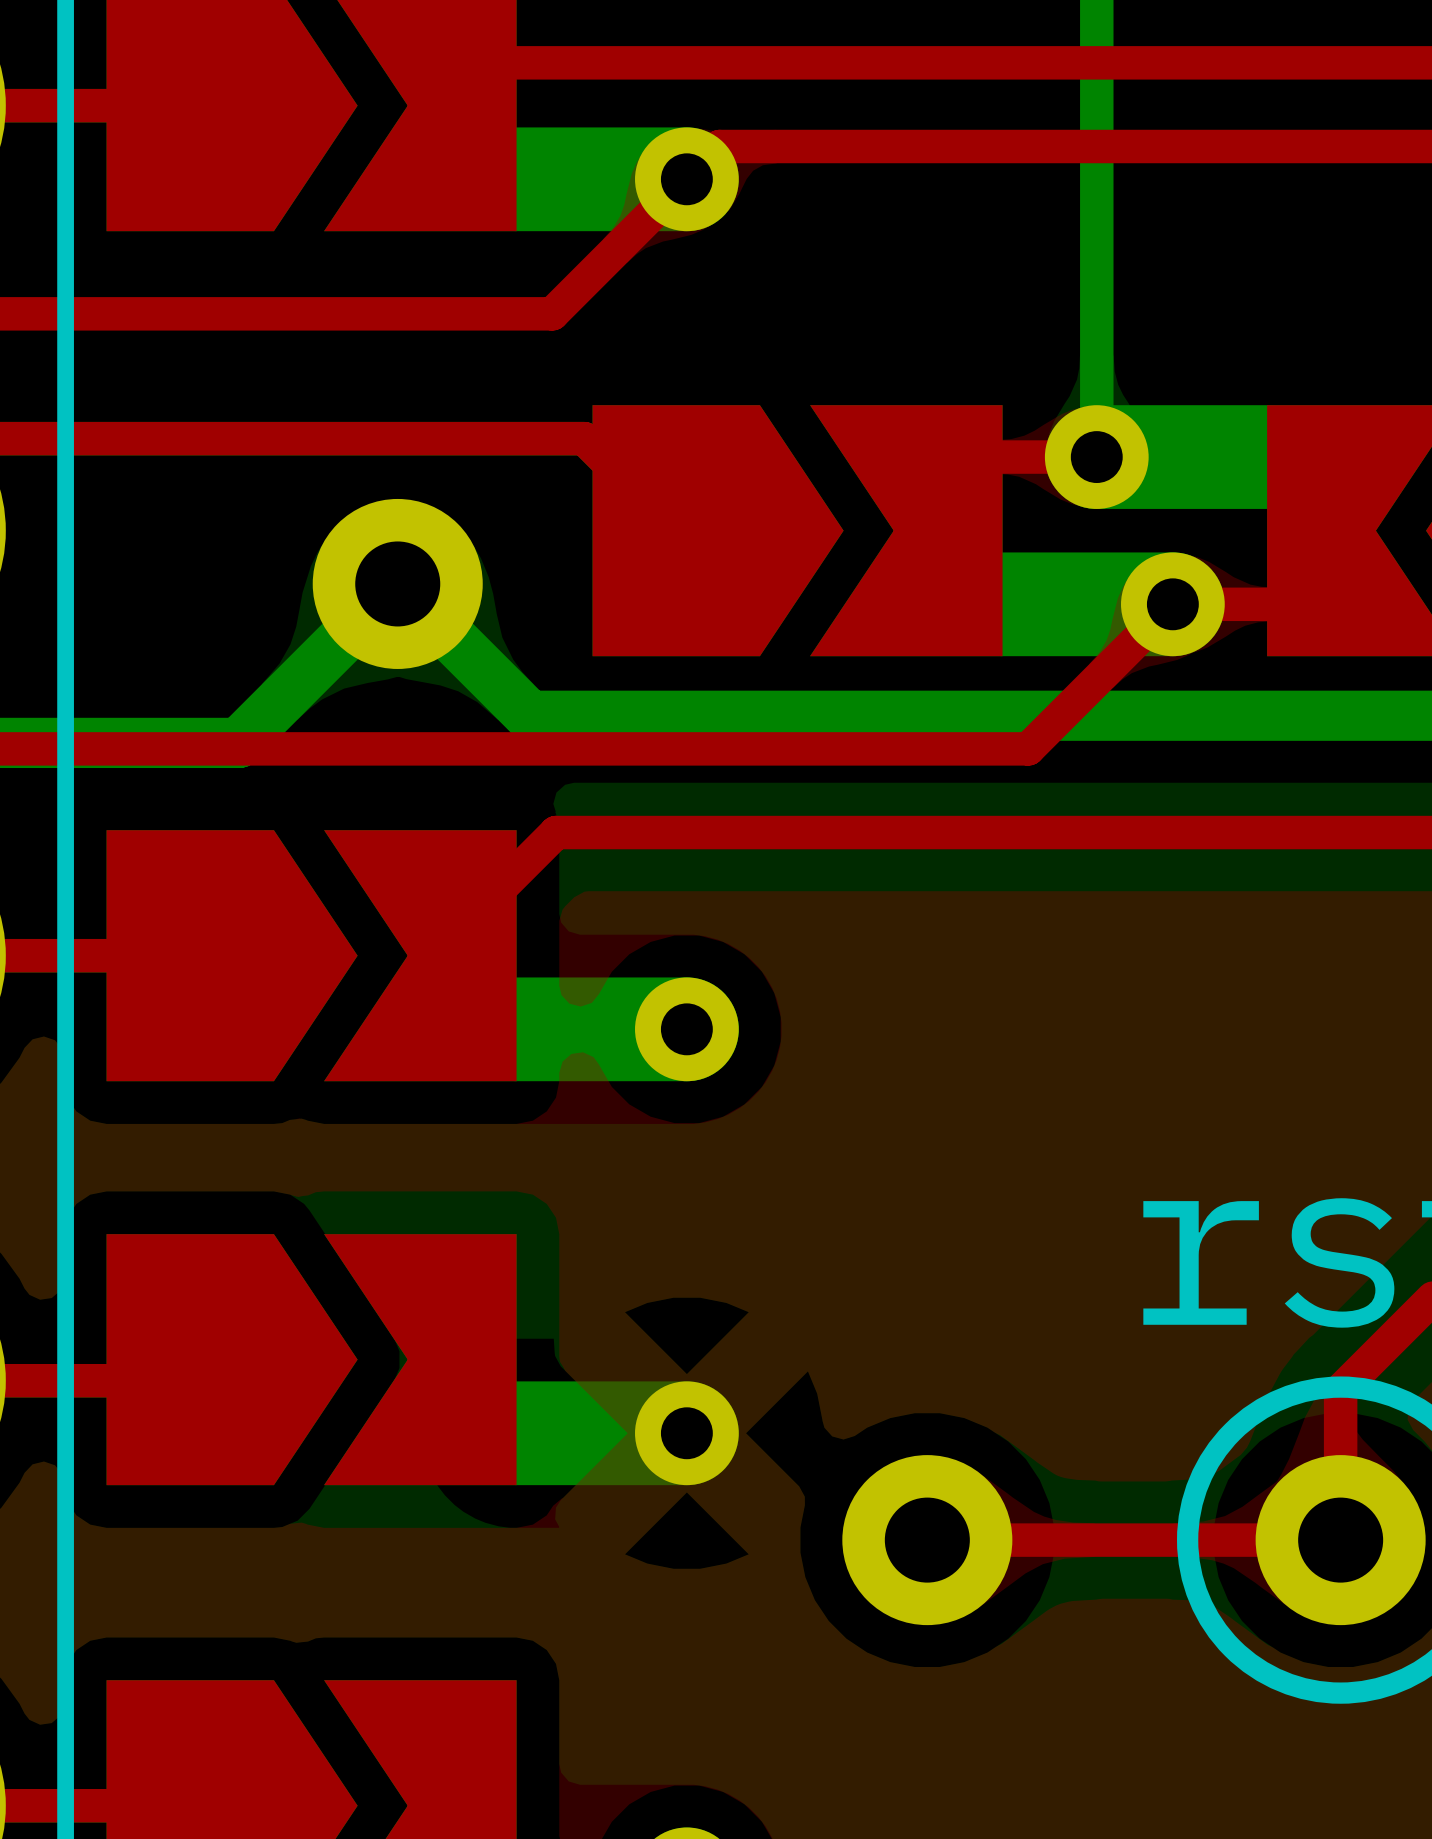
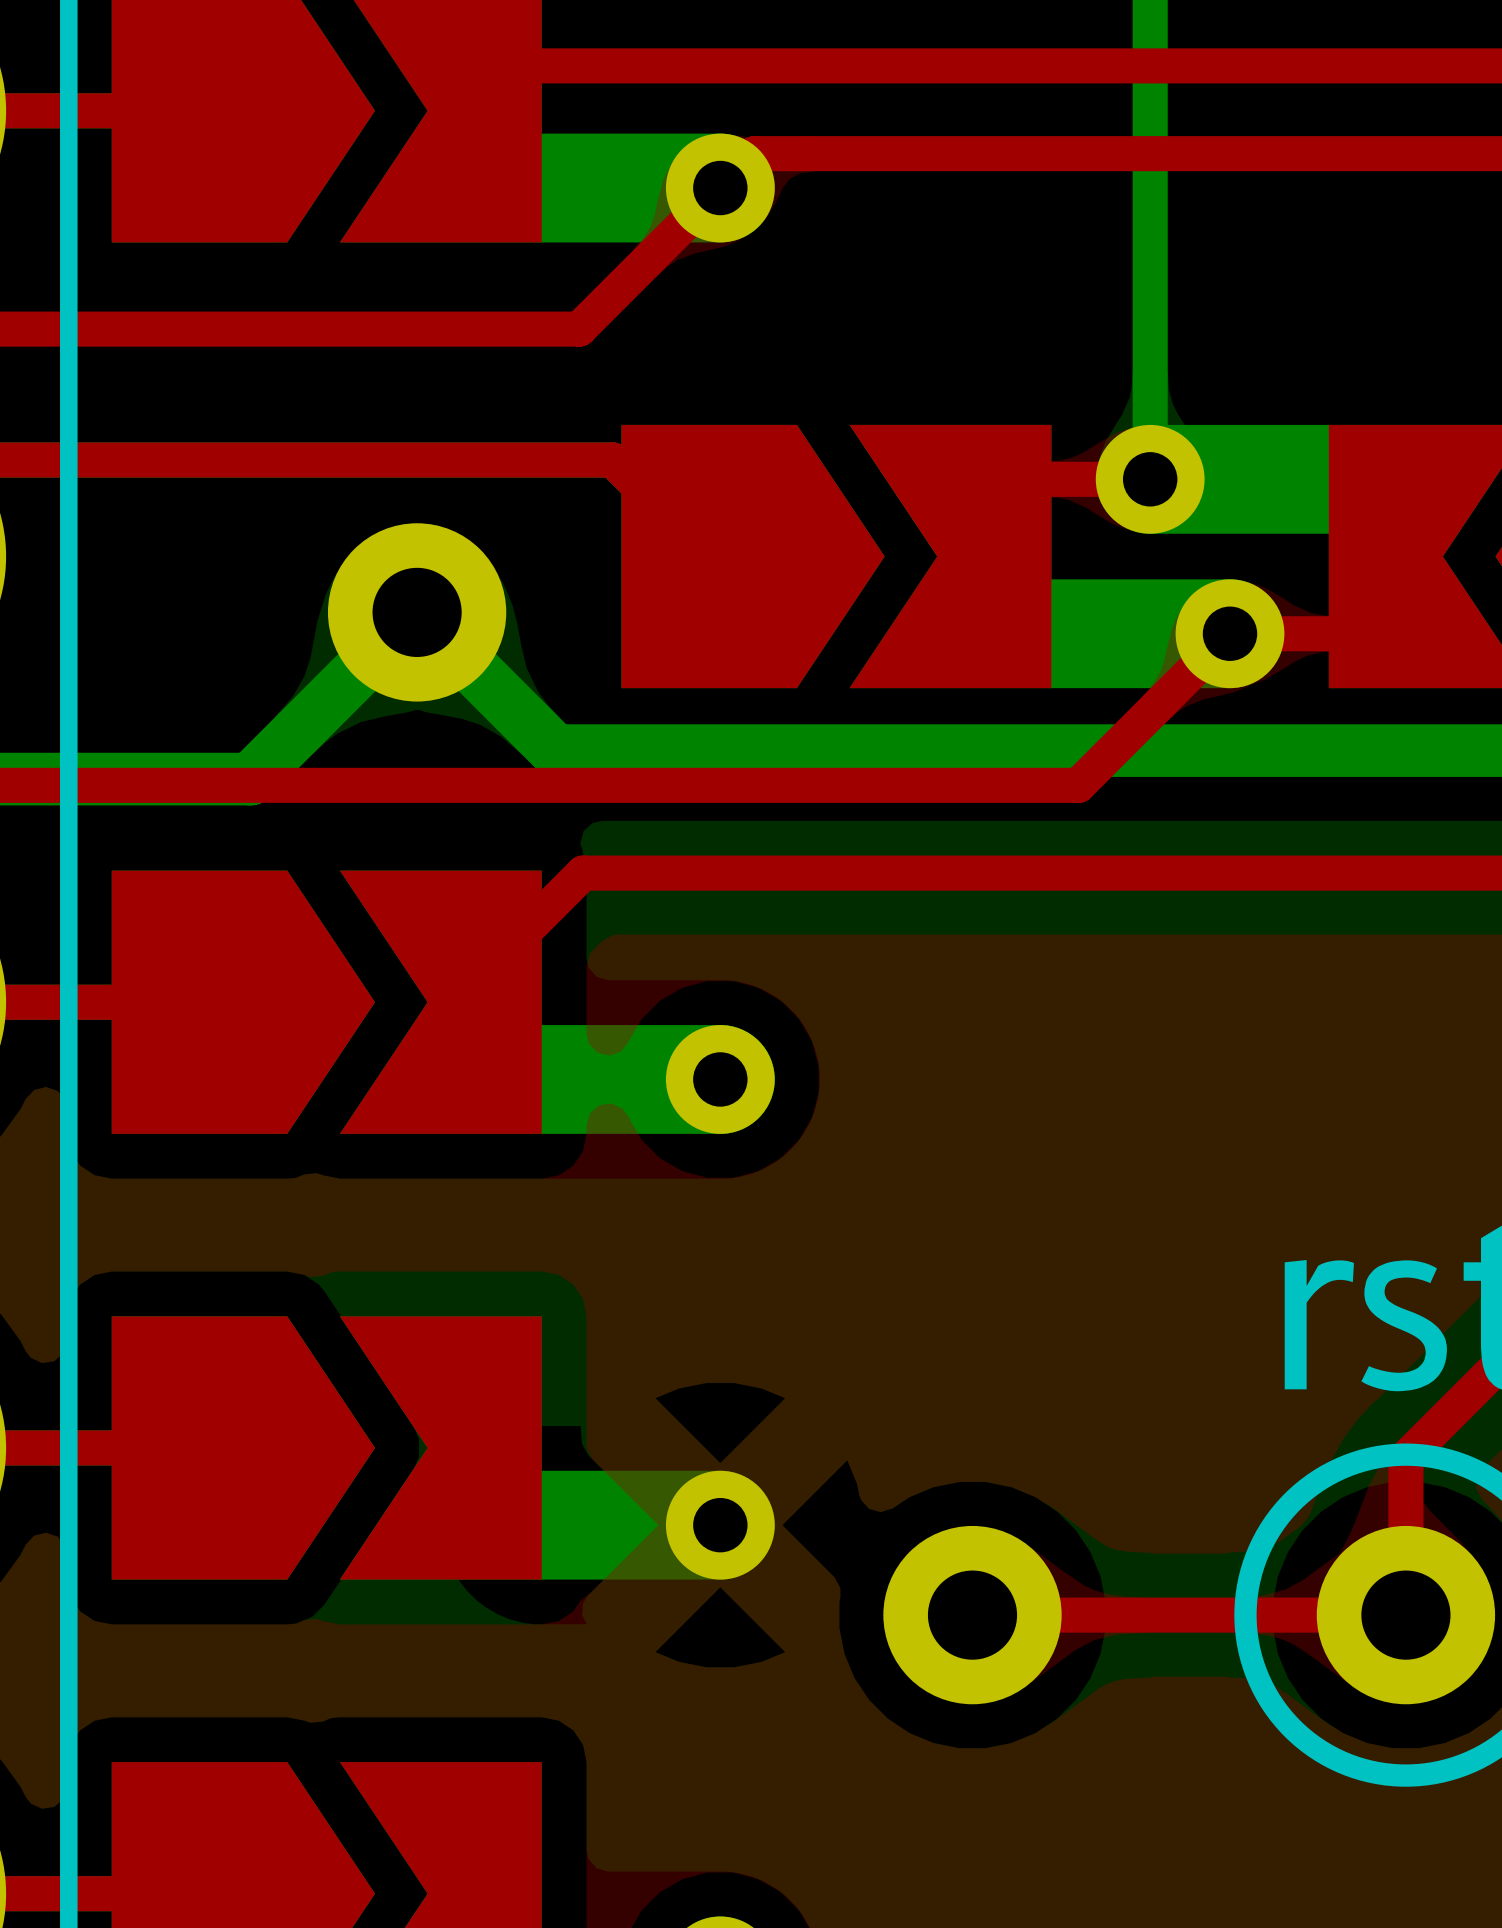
part position: (422, 1359) -> (443, 1447)

